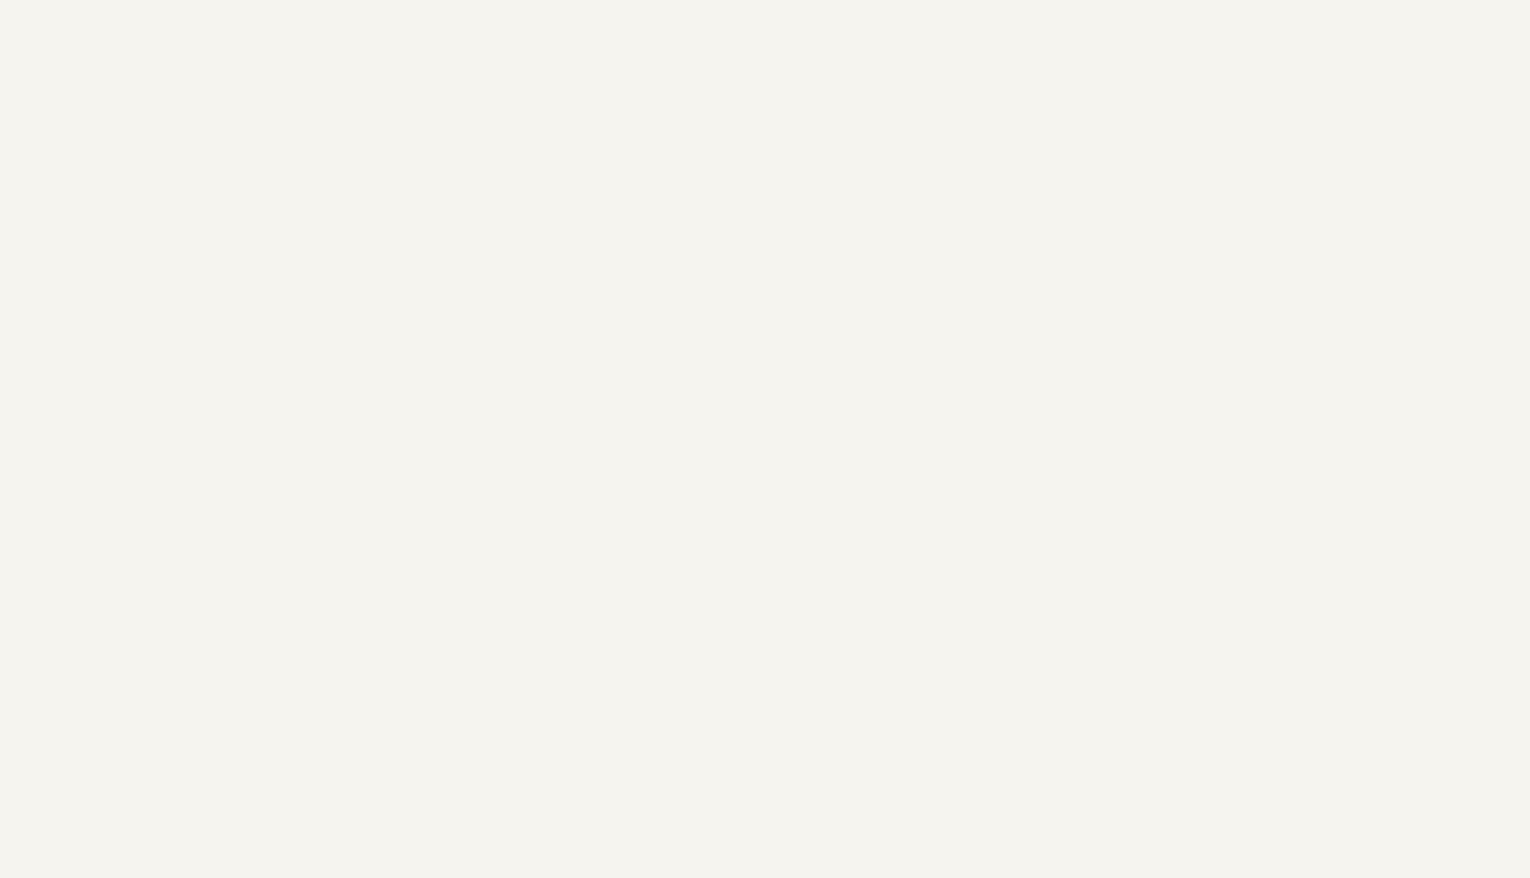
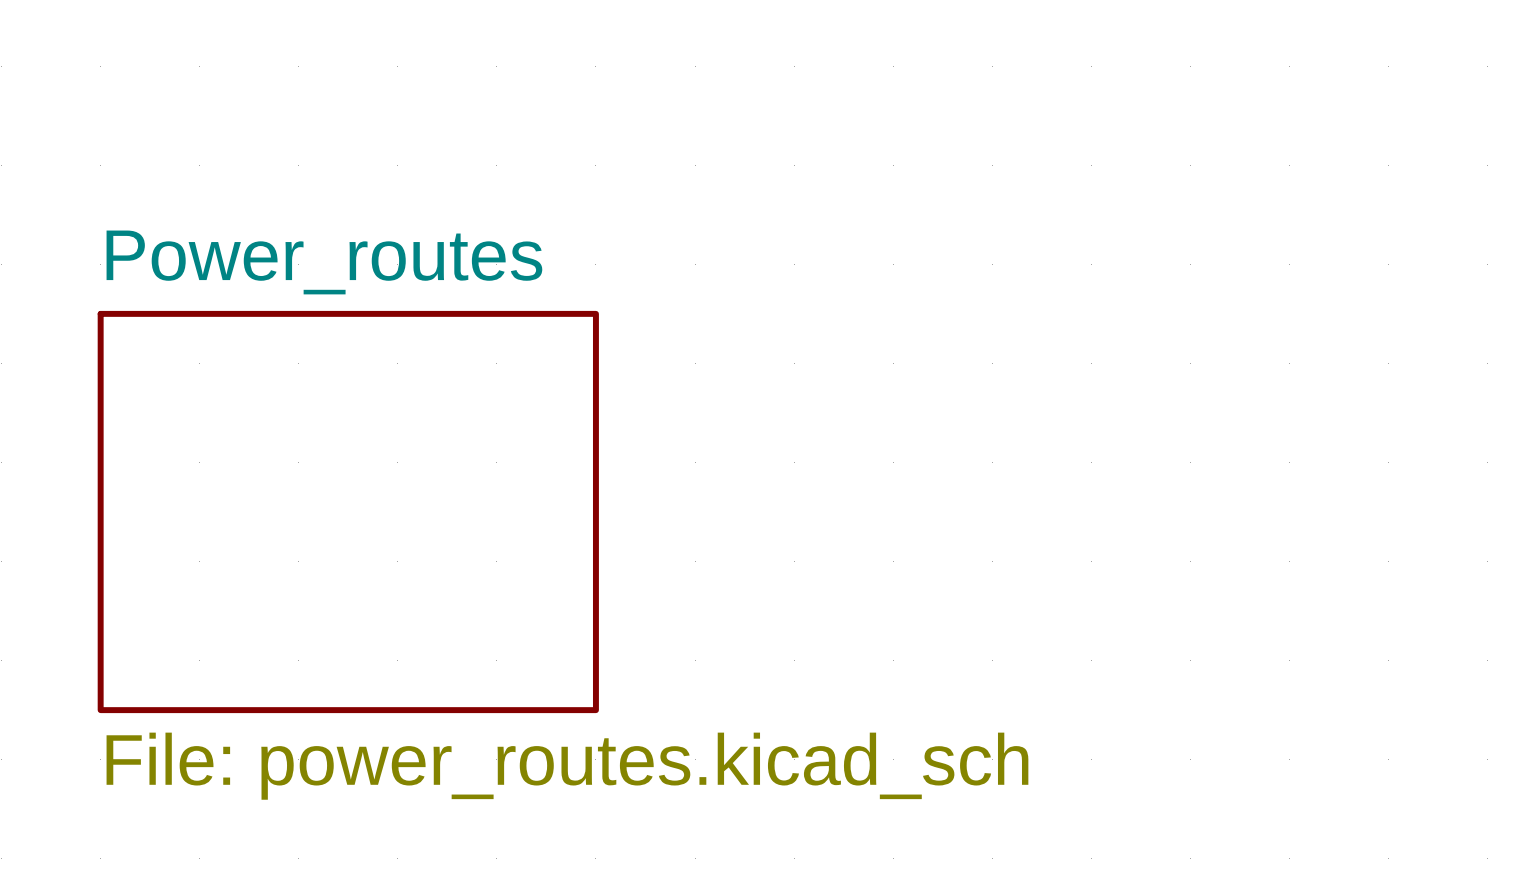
sheet Power_routes: none -> File: power_routes.kicad_sch (348, 512)

